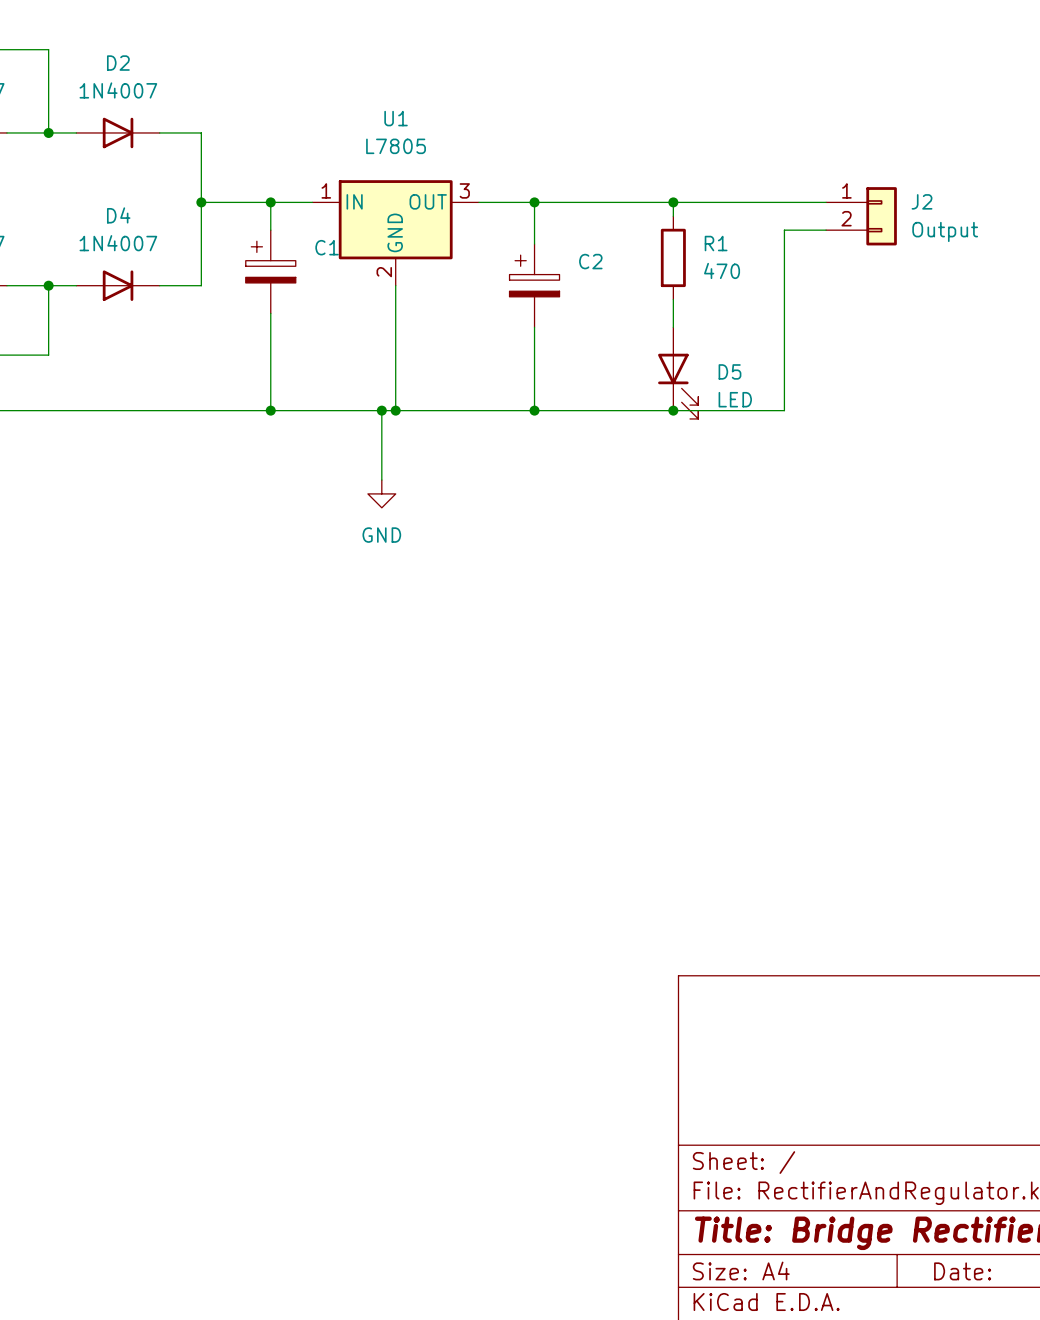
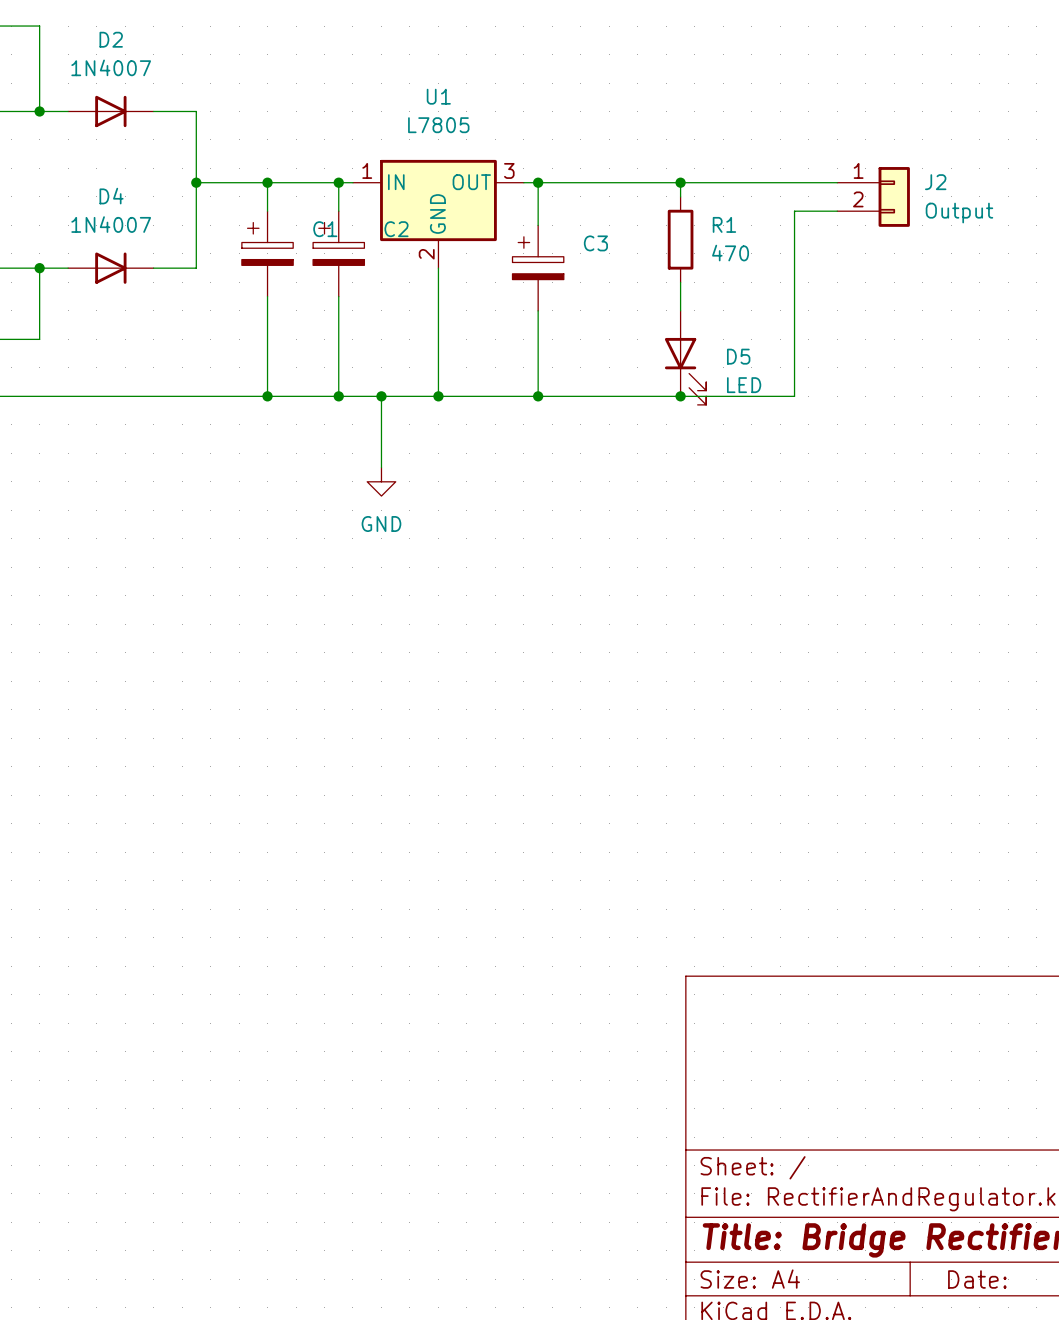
junction: none -> (338, 182)
U1 position: (395, 232) -> (438, 214)
C2 name: C2 (590, 261) -> C3 (595, 243)
C2: none -> (338, 253)
wire: (395, 285) (395, 410) -> (438, 268) (438, 396)
wire: none -> (338, 296) (338, 396)
junction: none -> (338, 396)
junction: (395, 410) -> none
junction: none -> (438, 396)

